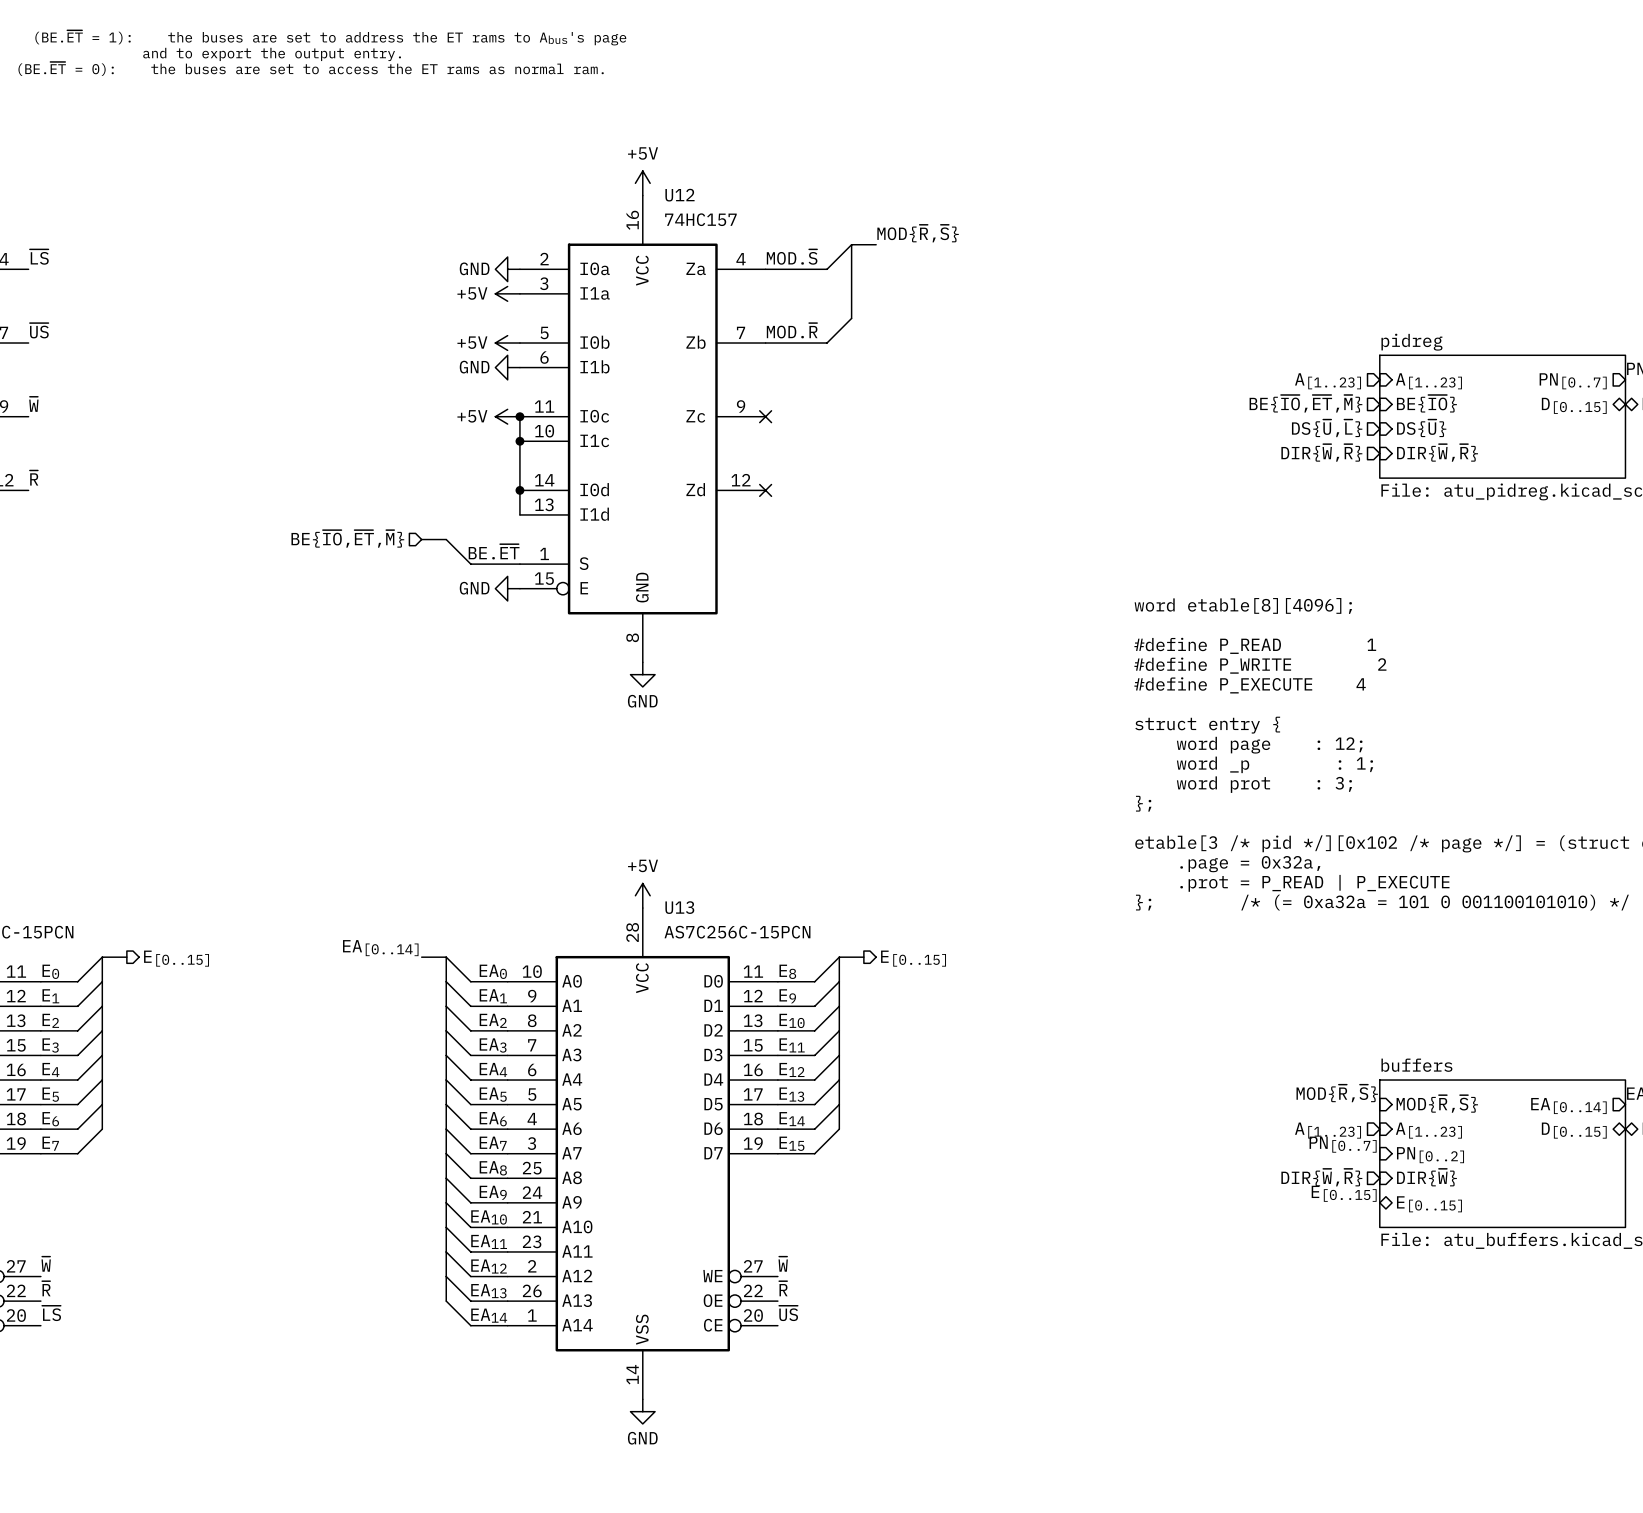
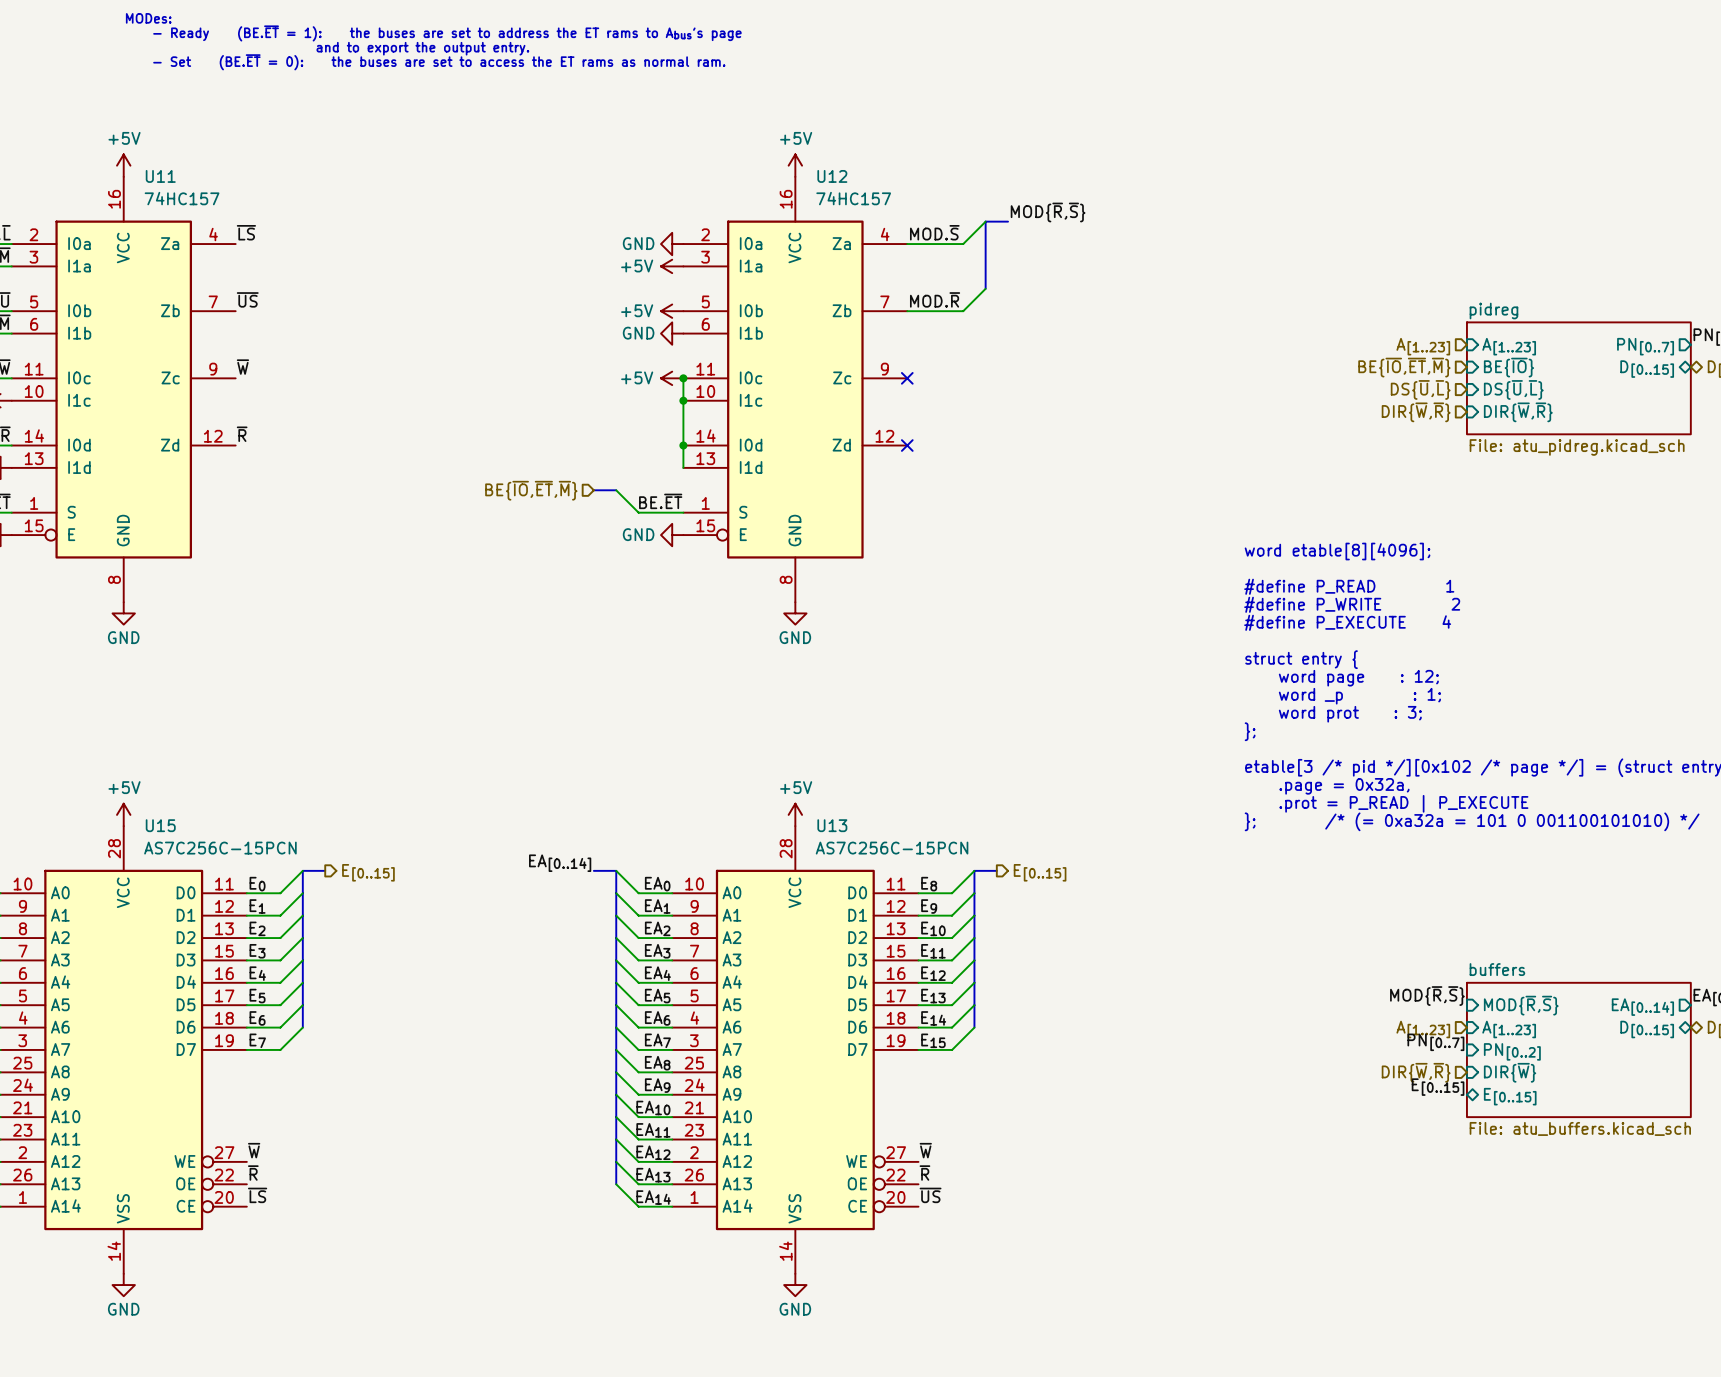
sheet pin: DS{~{U}} (1421, 428) -> DS{~{U},~{L}} (1513, 389)

